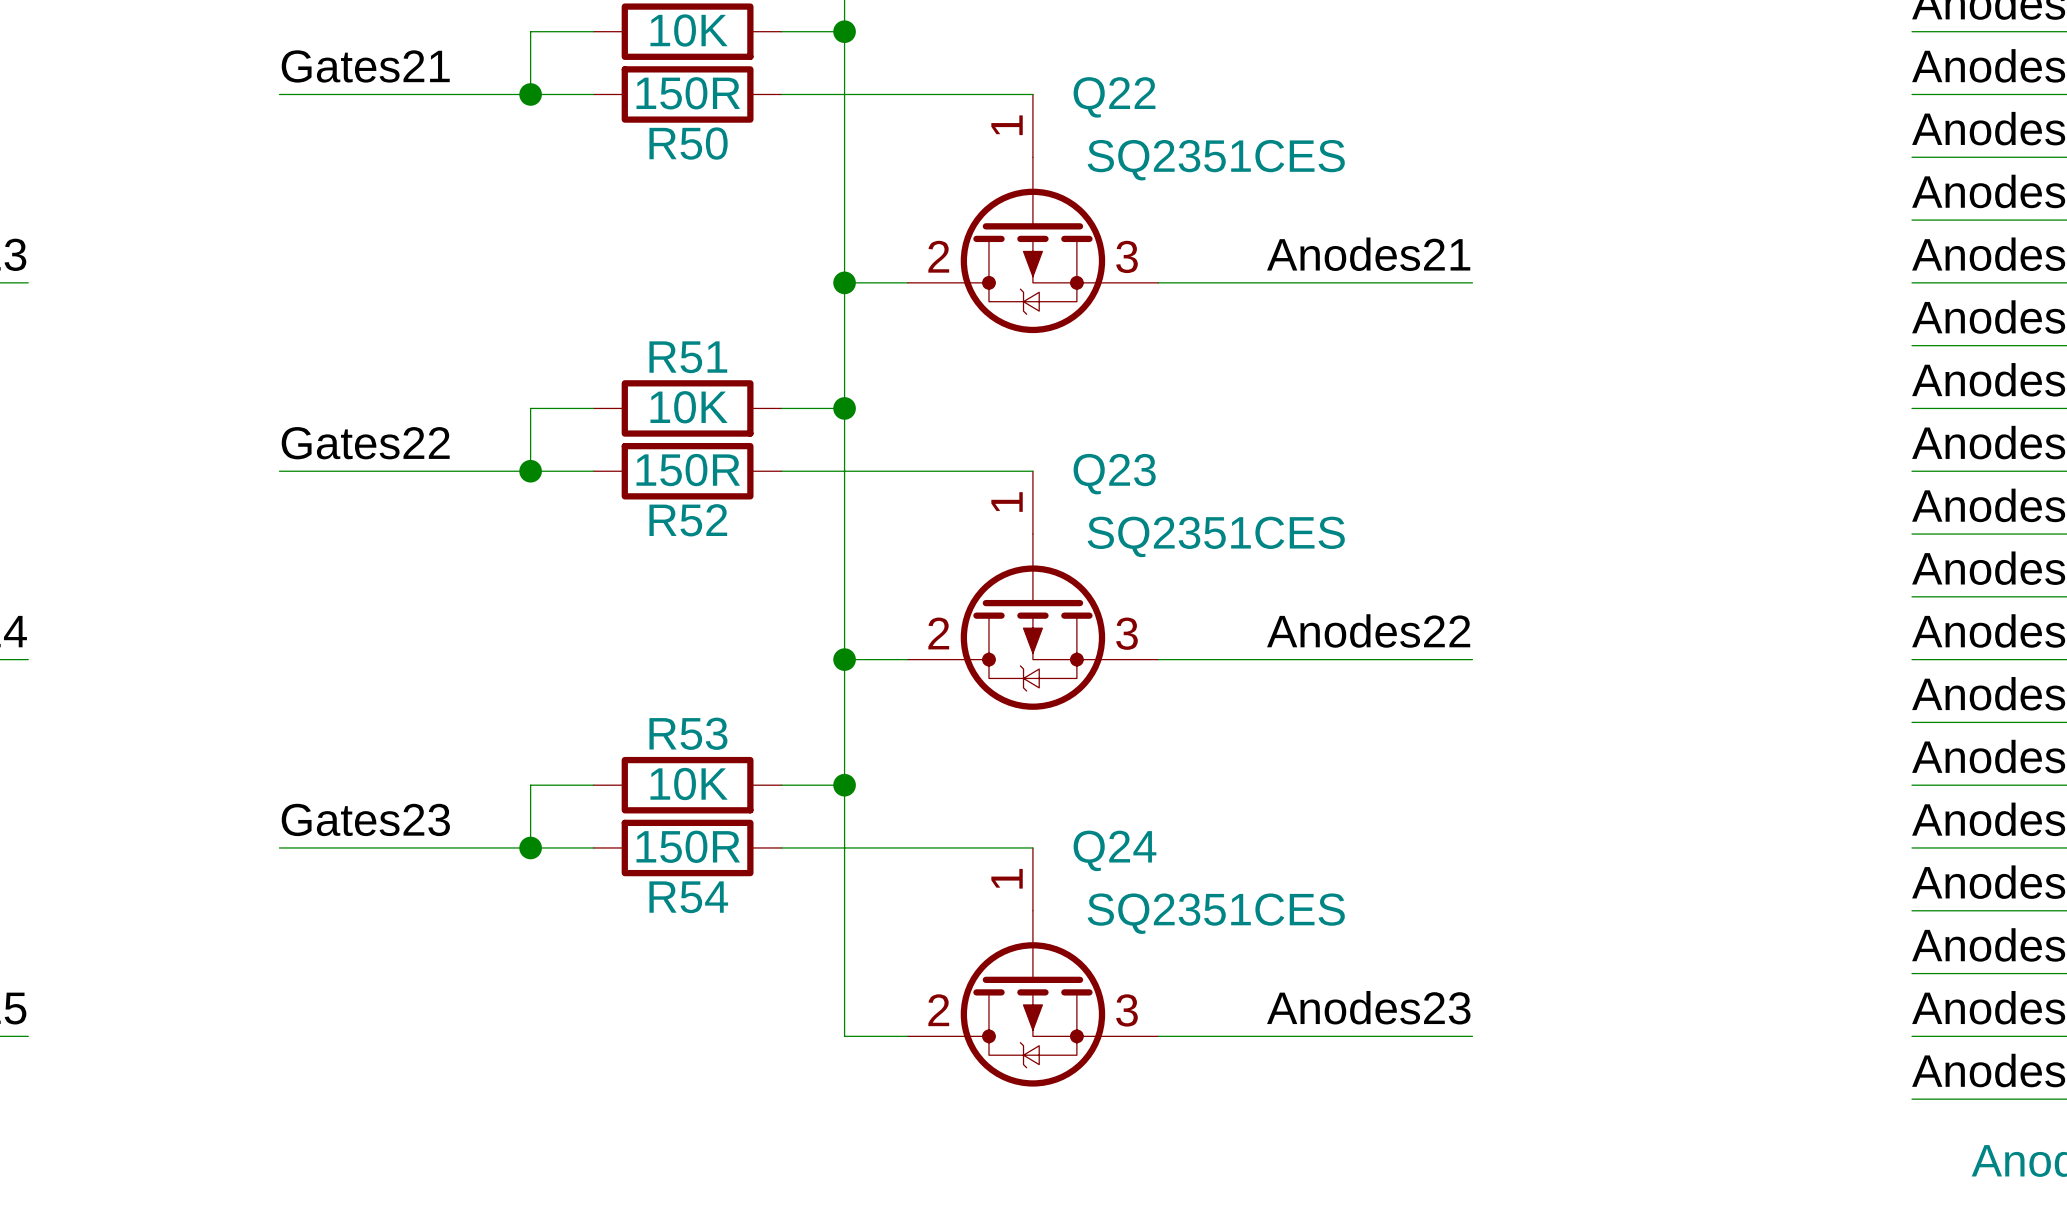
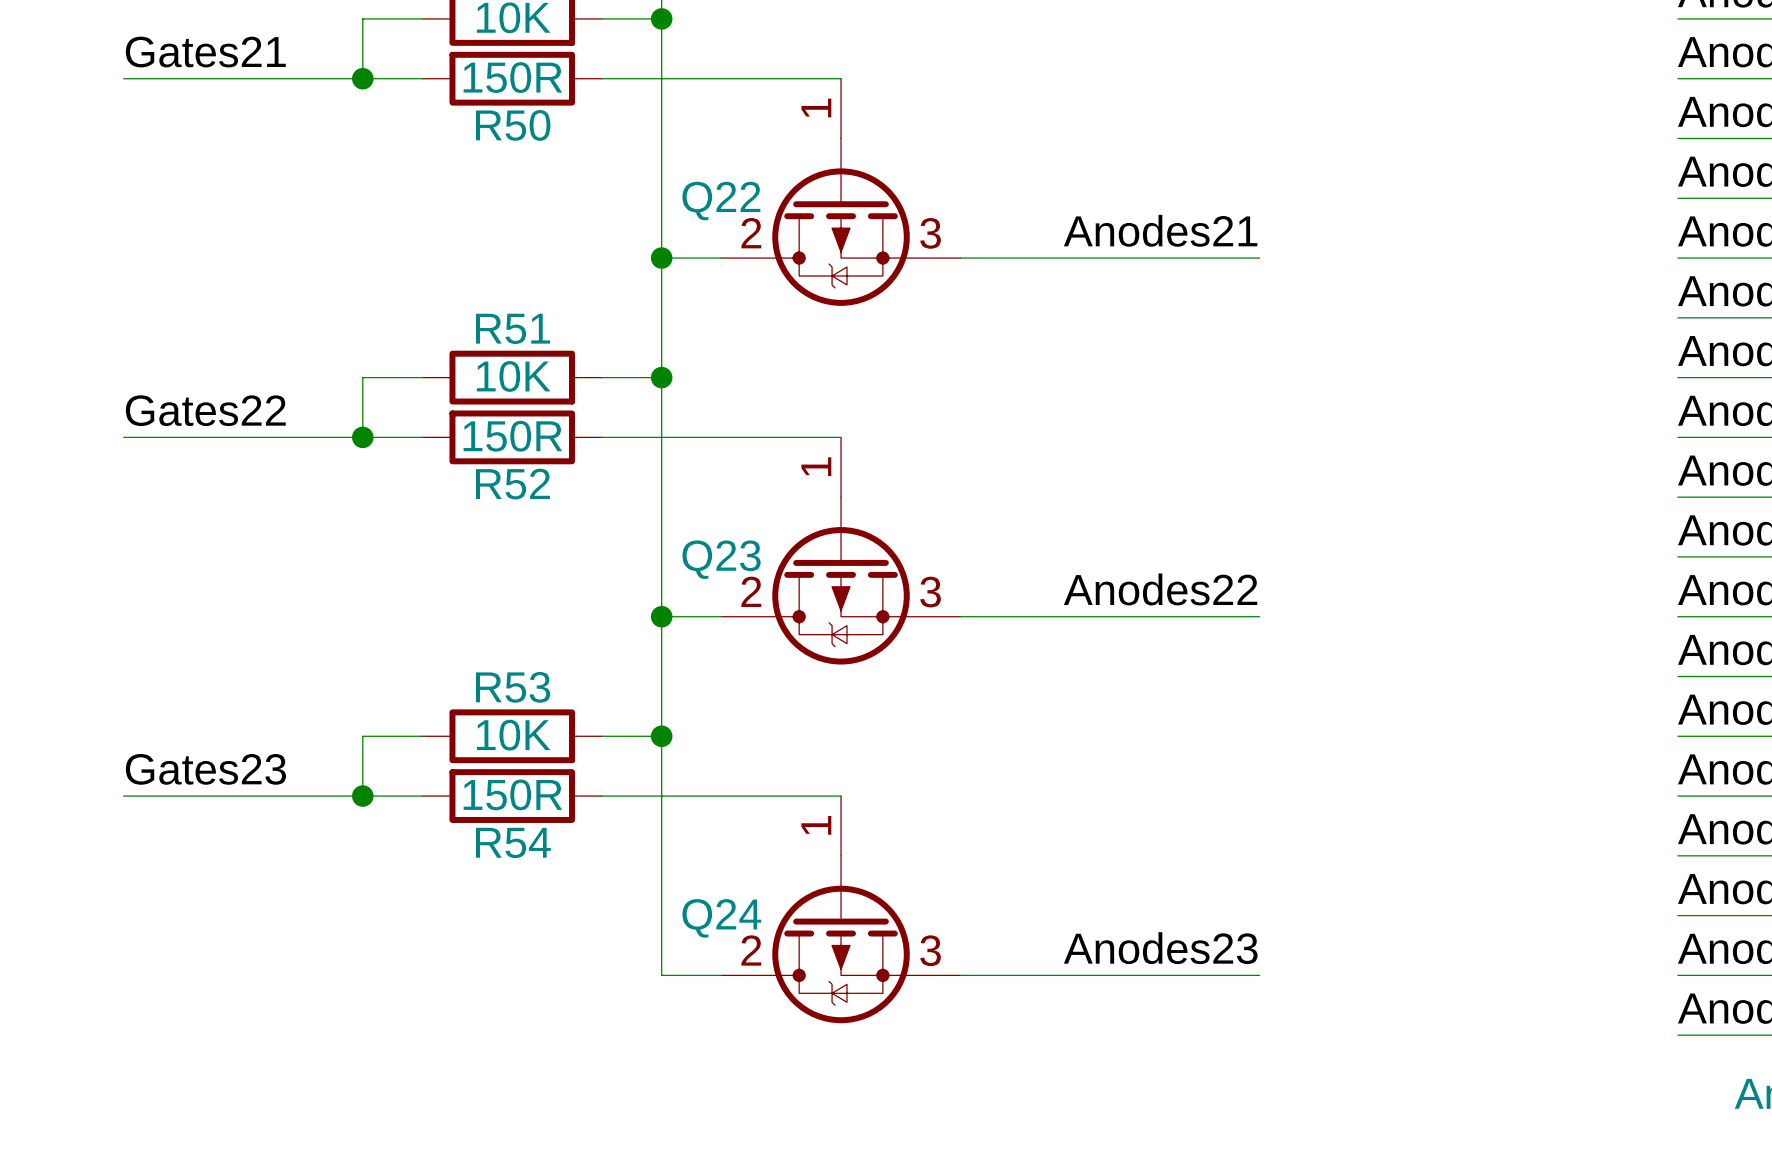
Q22 name position: Q22 (1114, 97) -> Q22 (721, 201)
Q22 value: SQ2351CES (1216, 160) -> none
Q23 name position: Q23 (1114, 474) -> Q23 (721, 559)
Q23 value: SQ2351CES (1216, 536) -> none
Q24 name position: Q24 (1114, 850) -> Q24 (721, 918)
Q24 value: SQ2351CES (1216, 913) -> none

